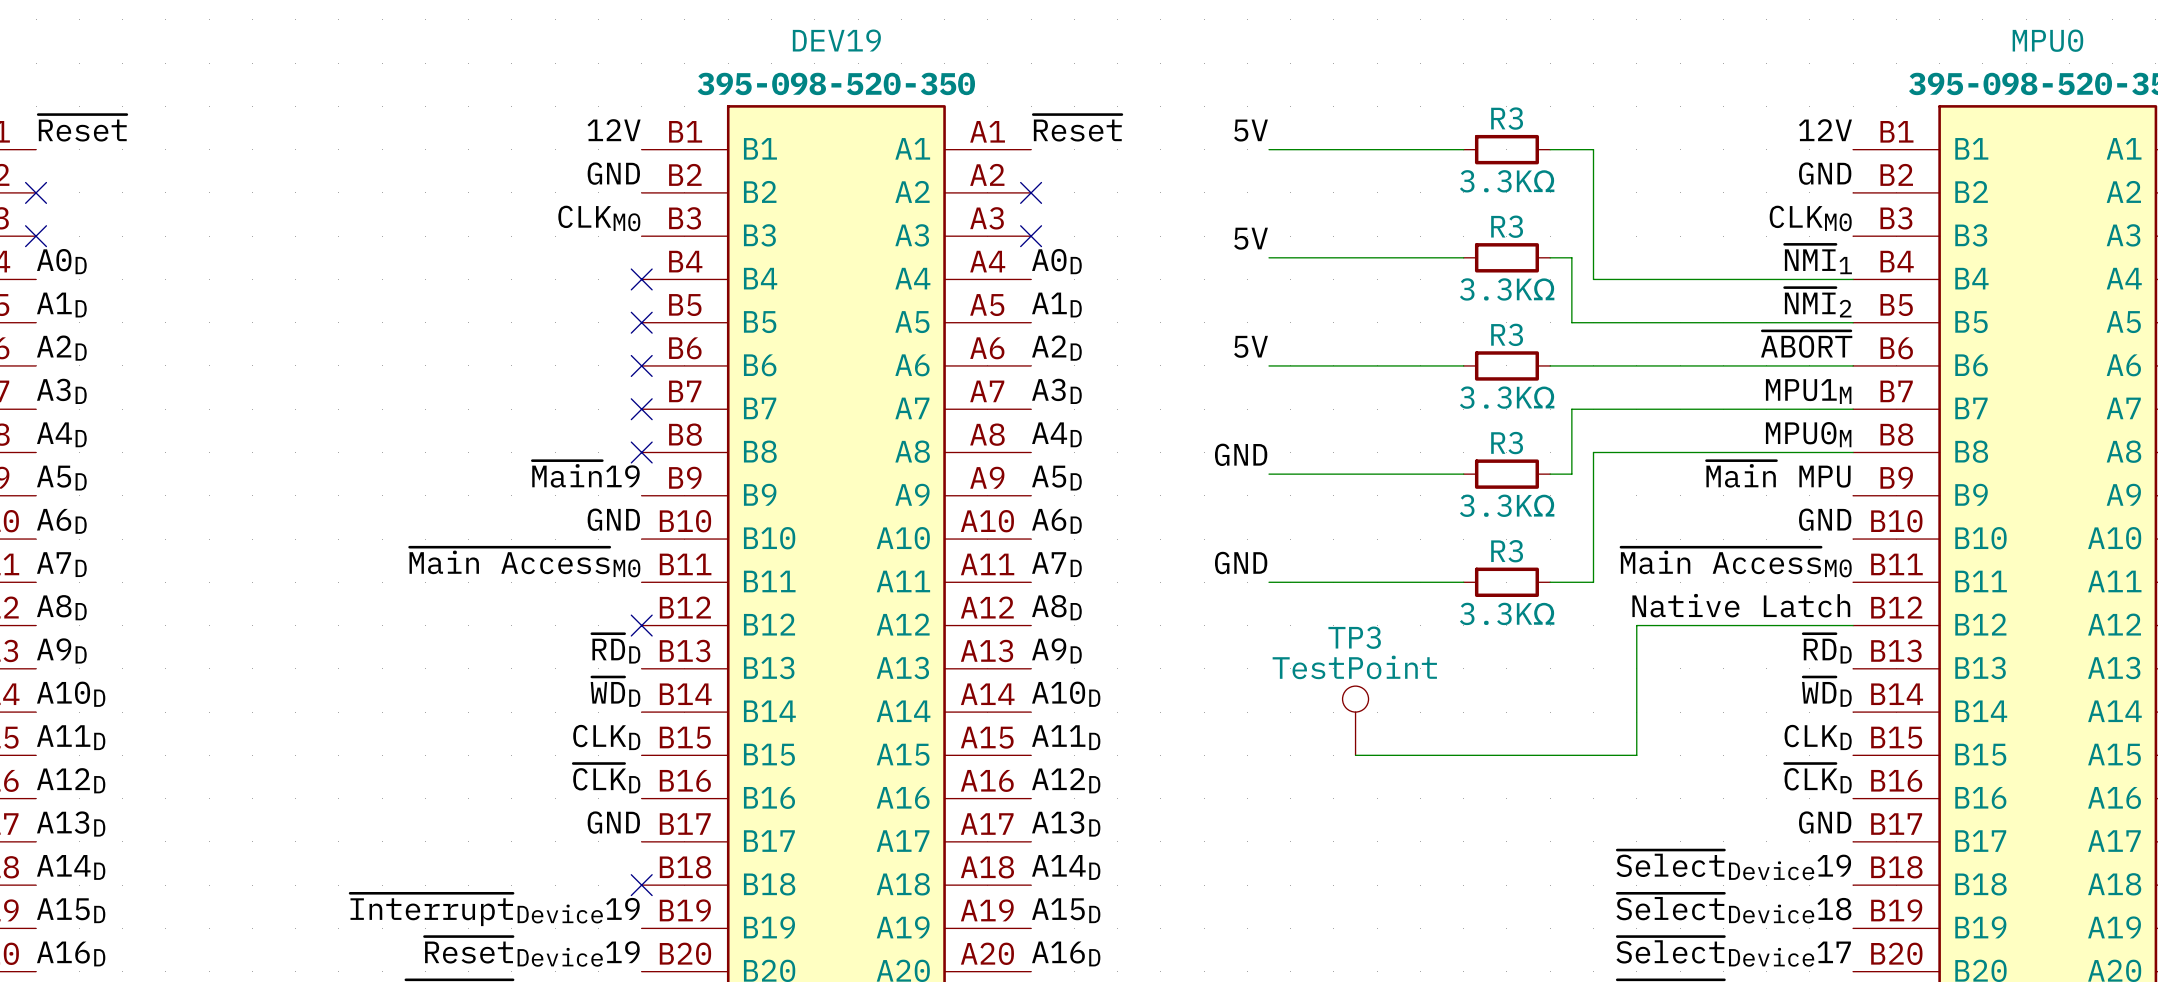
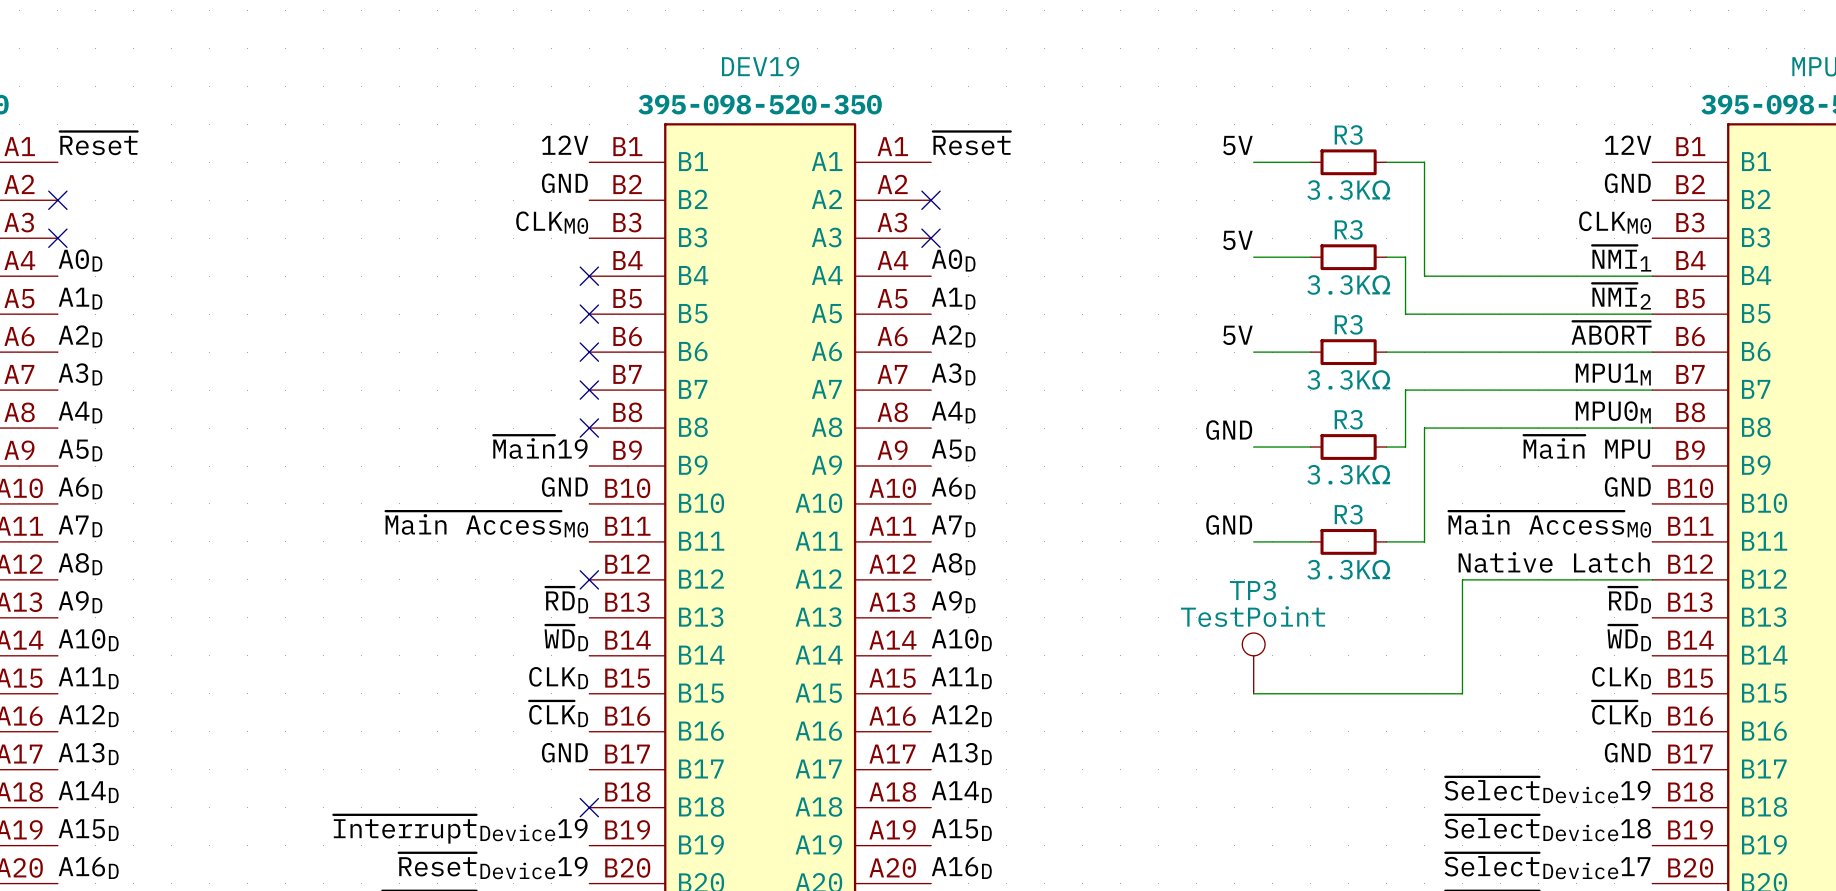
label: 5V (1251, 130) -> none
label: none -> 5V (1237, 145)
wire: (1269, 149) (1398, 149) -> none
label: 5V (1251, 238) -> none
label: none -> 5V (1237, 240)
wire: (1269, 257) (1398, 257) -> none
label: 5V (1251, 346) -> none
label: none -> 5V (1237, 335)
wire: (1269, 365) (1398, 365) -> none
label: GND (1241, 454) -> none
label: none -> GND (1229, 430)
wire: (1269, 474) (1398, 474) -> none
label: GND (1241, 562) -> none
label: none -> GND (1229, 524)
wire: (1269, 582) (1398, 582) -> none
TP3 position: (1355, 720) -> (1253, 663)
wire: (1355, 755) (1398, 755) -> none

